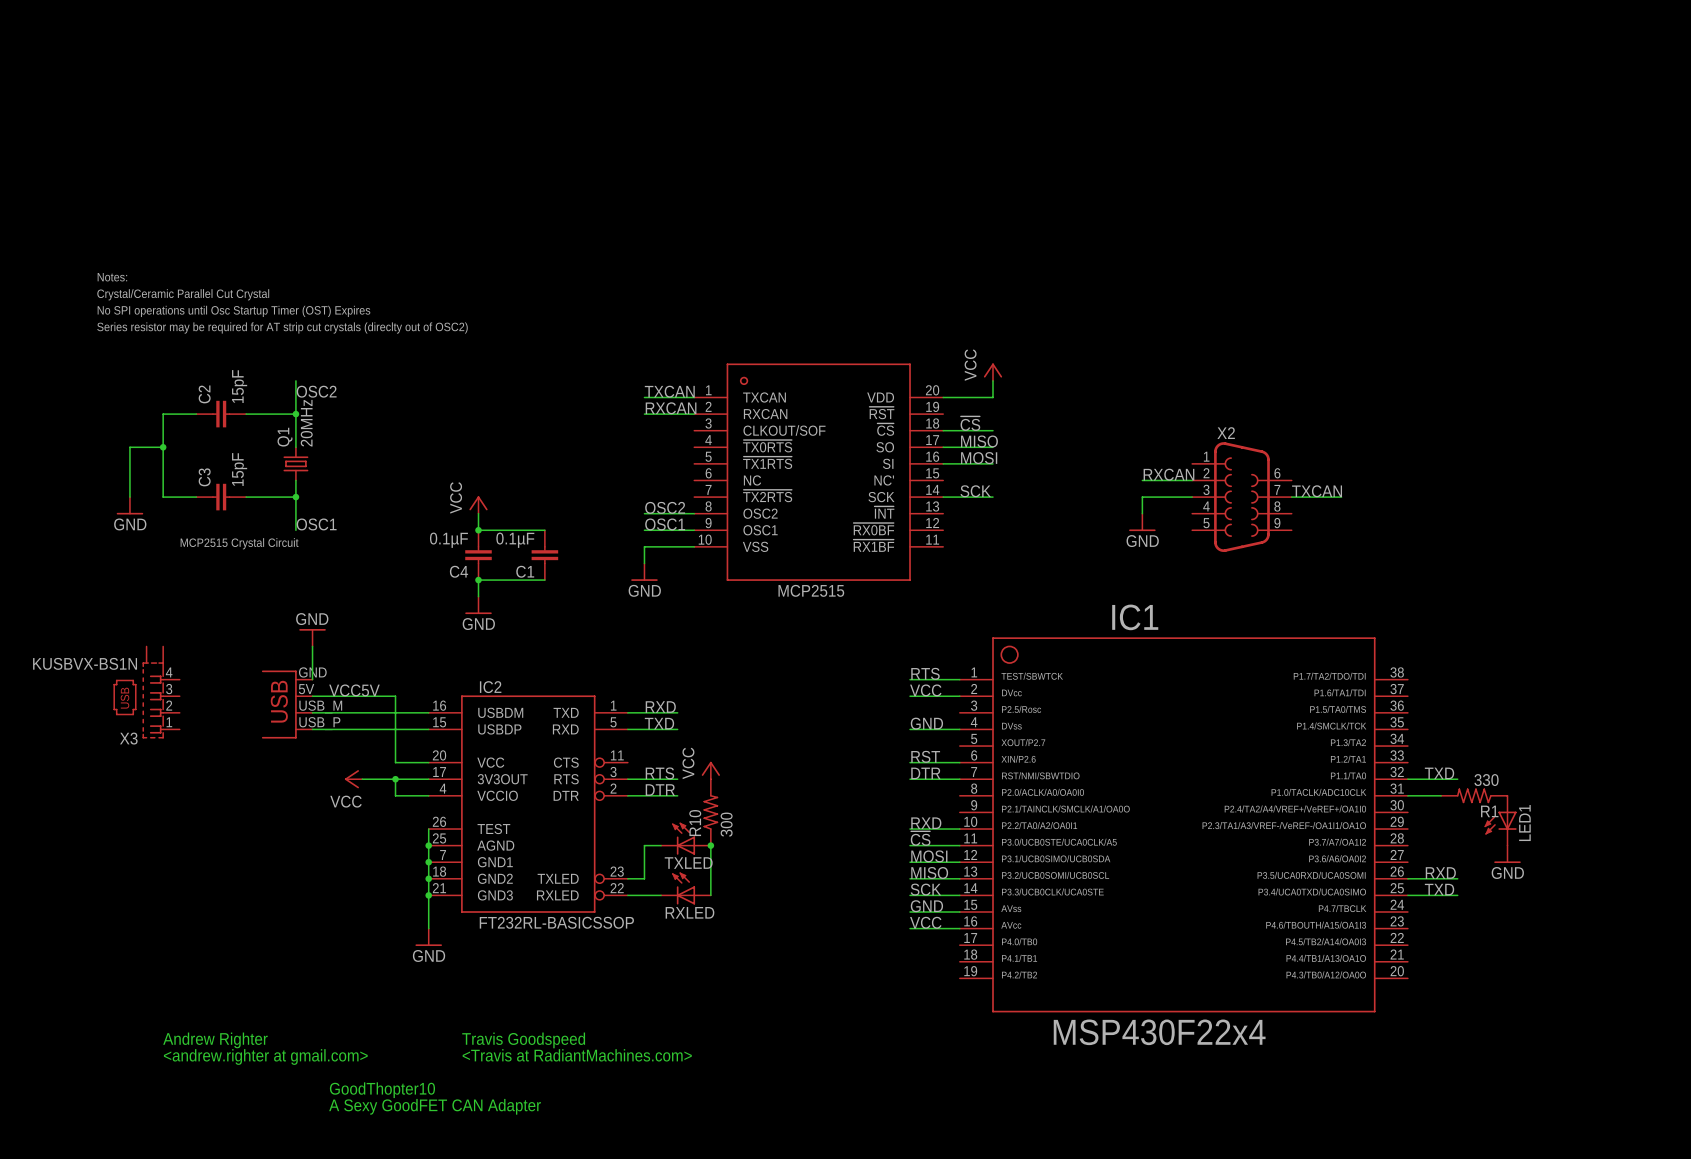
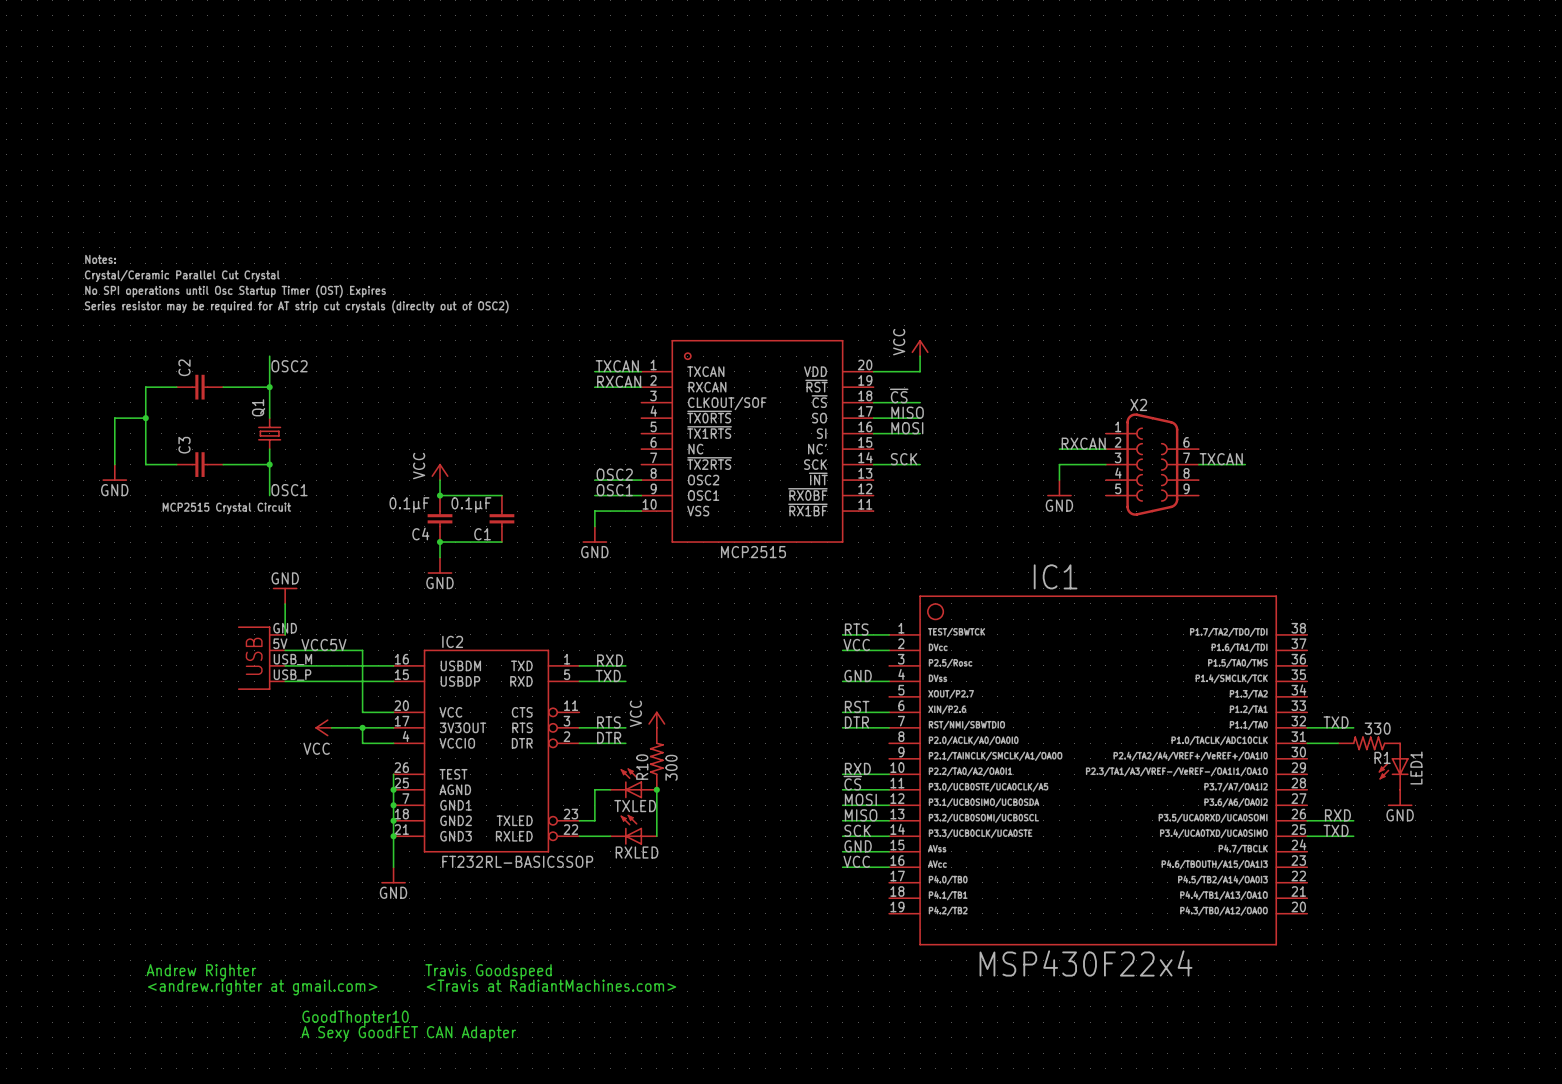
C2 value: 15pF (239, 386) -> none
Q1 value: 20MHz (306, 423) -> none
C3 value: 15pF (239, 469) -> none
X3: KUSBVX-BS1N (146, 692) -> none

